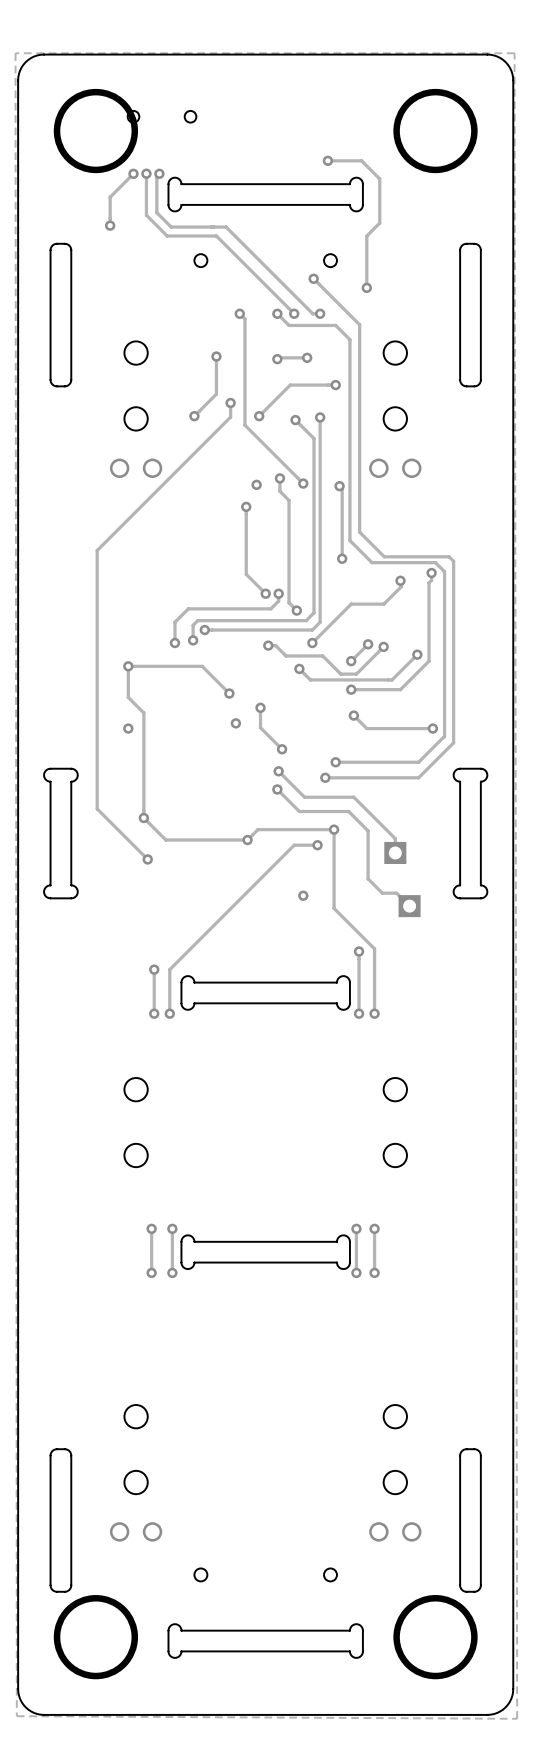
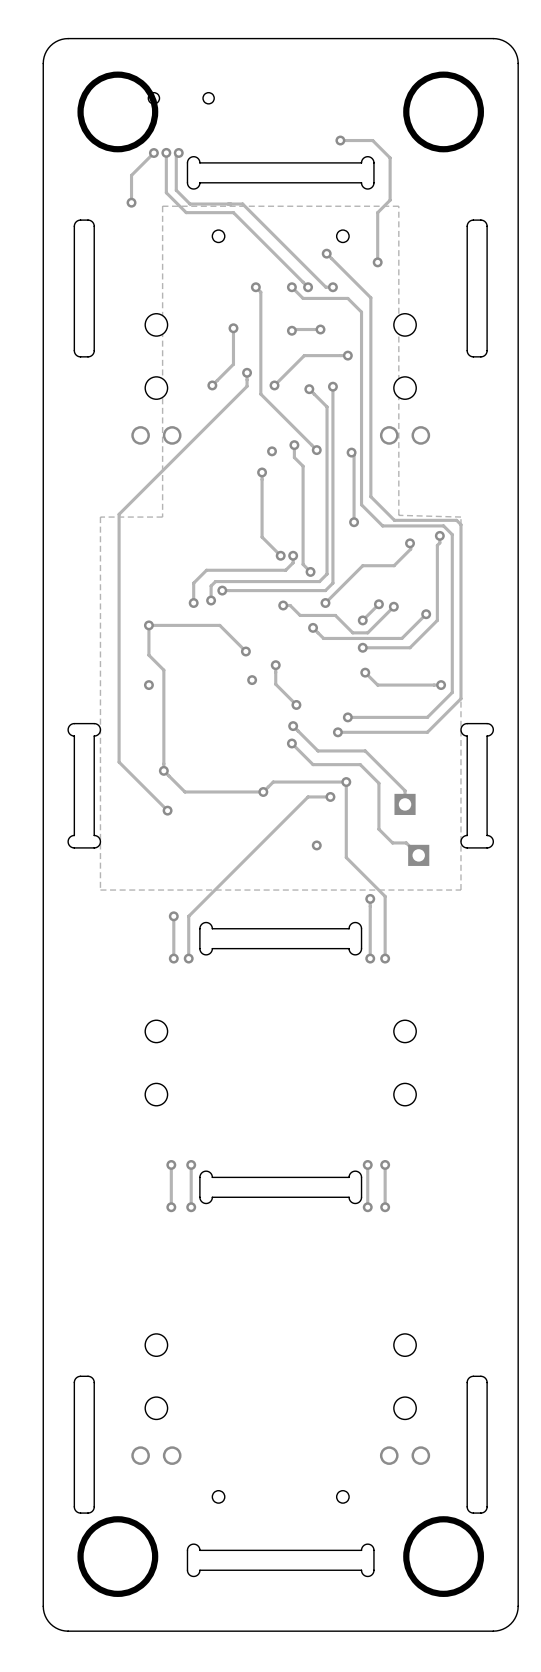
zone outline: (514, 53) (15, 53) (16, 1716) (517, 1718) (514, 53) -> none
zone outline: none -> (398, 206) (398, 515) (460, 517) (460, 890) (100, 890) (100, 517) (162, 517) (162, 206) (398, 206)

